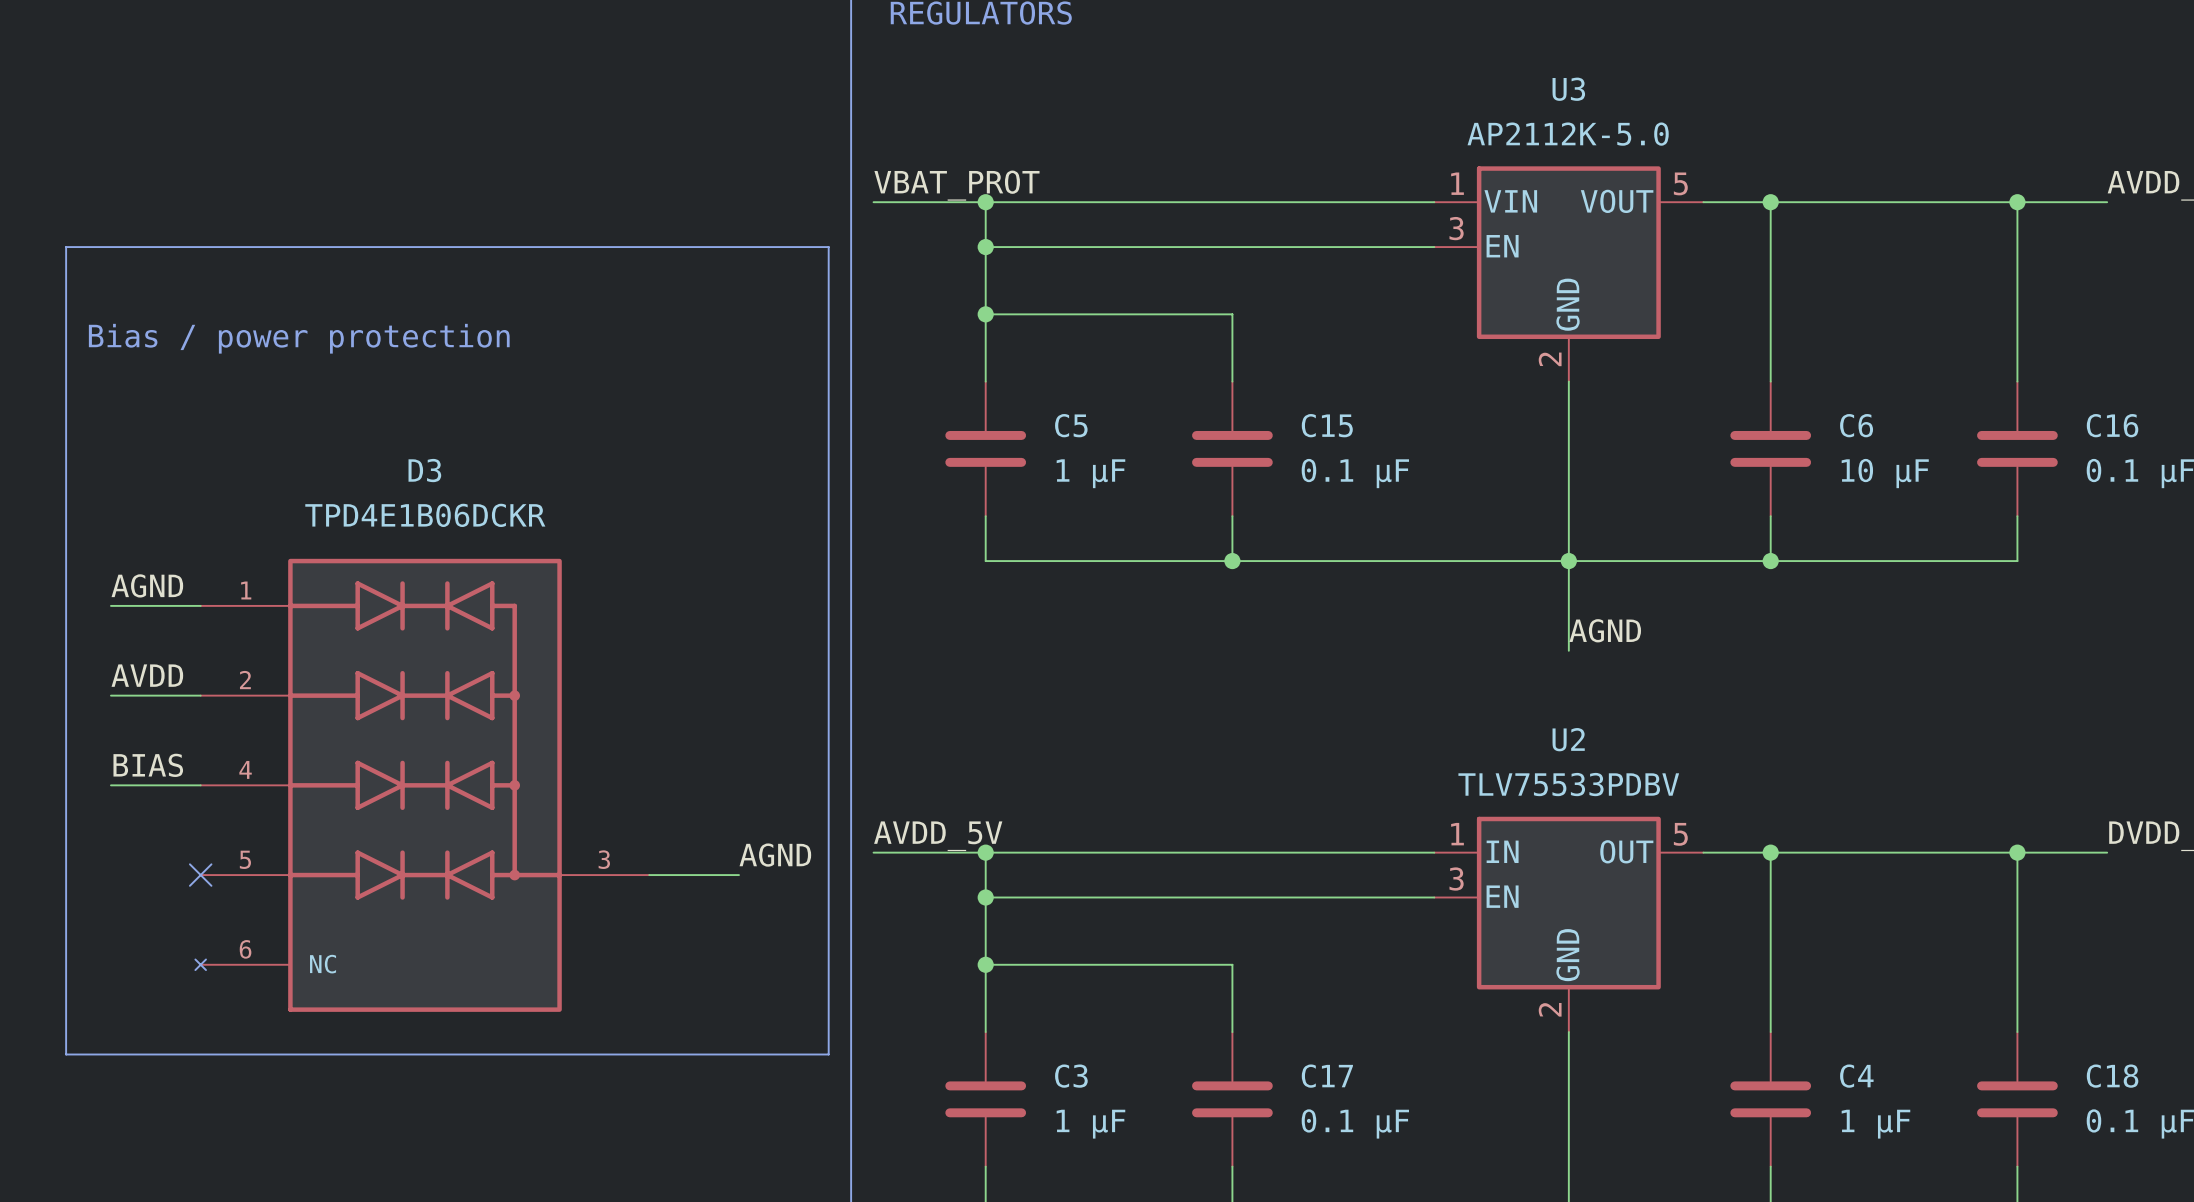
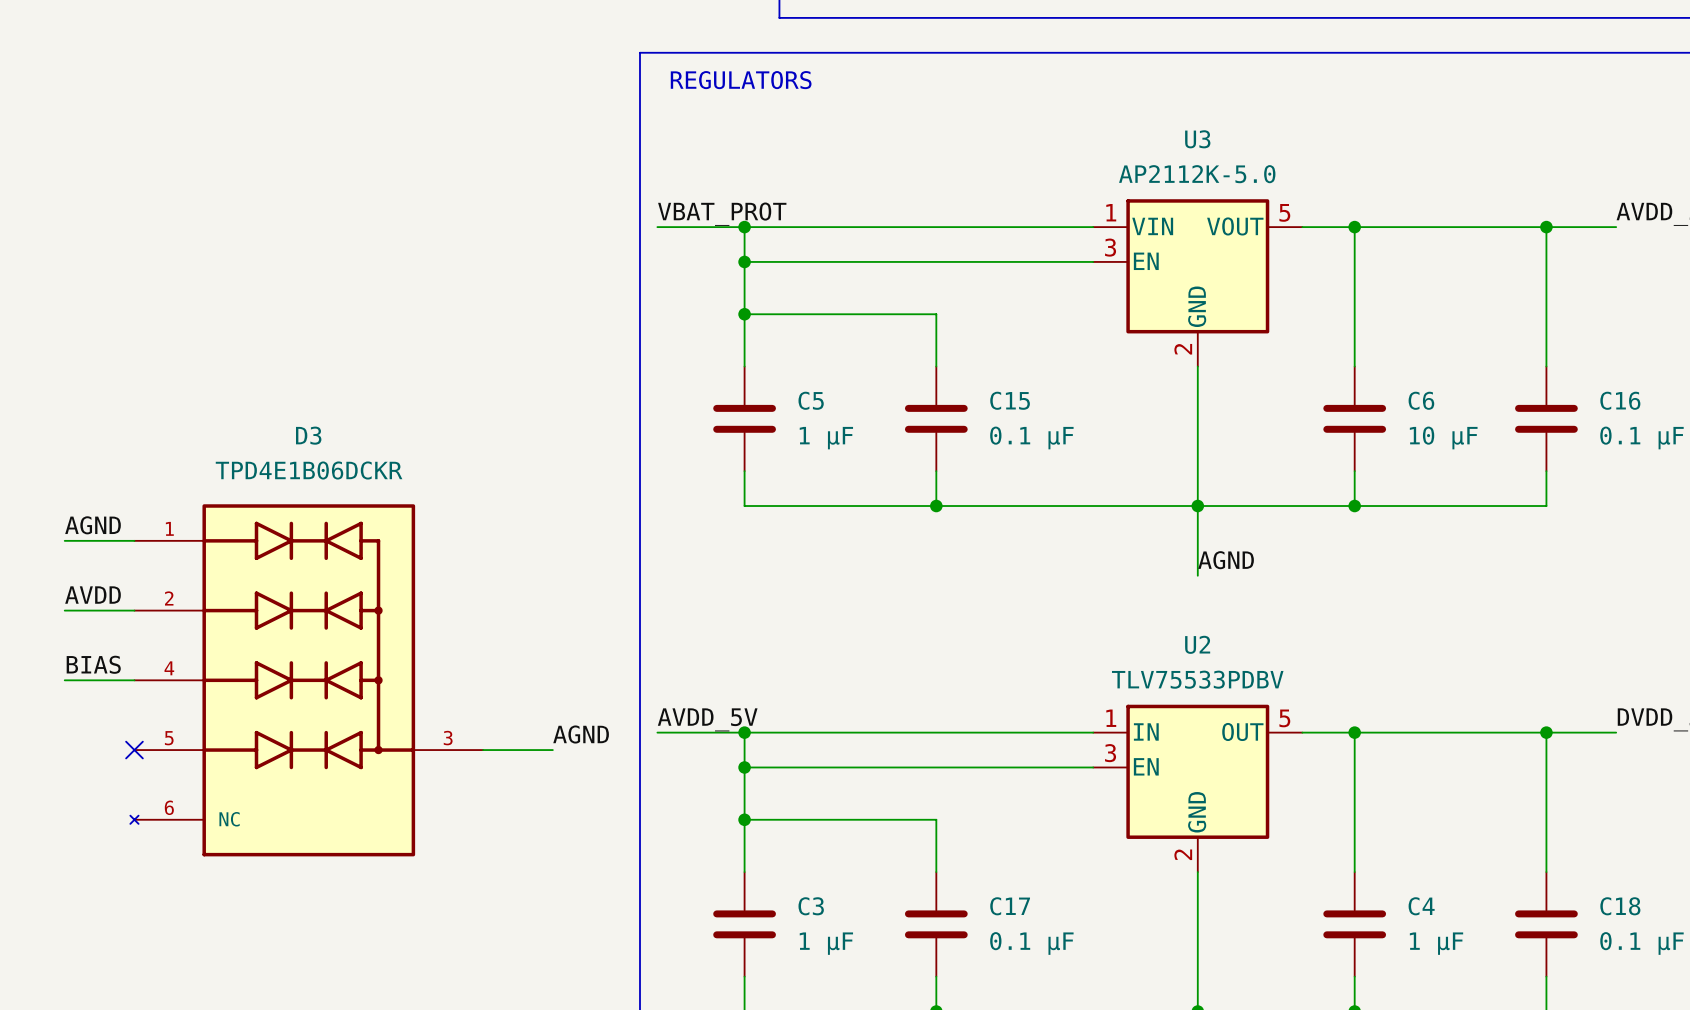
line: (66, 247) (828, 247) (828, 1054) (66, 1054) (66, 247) -> none
text: Bias / power protection (299, 338) -> none

